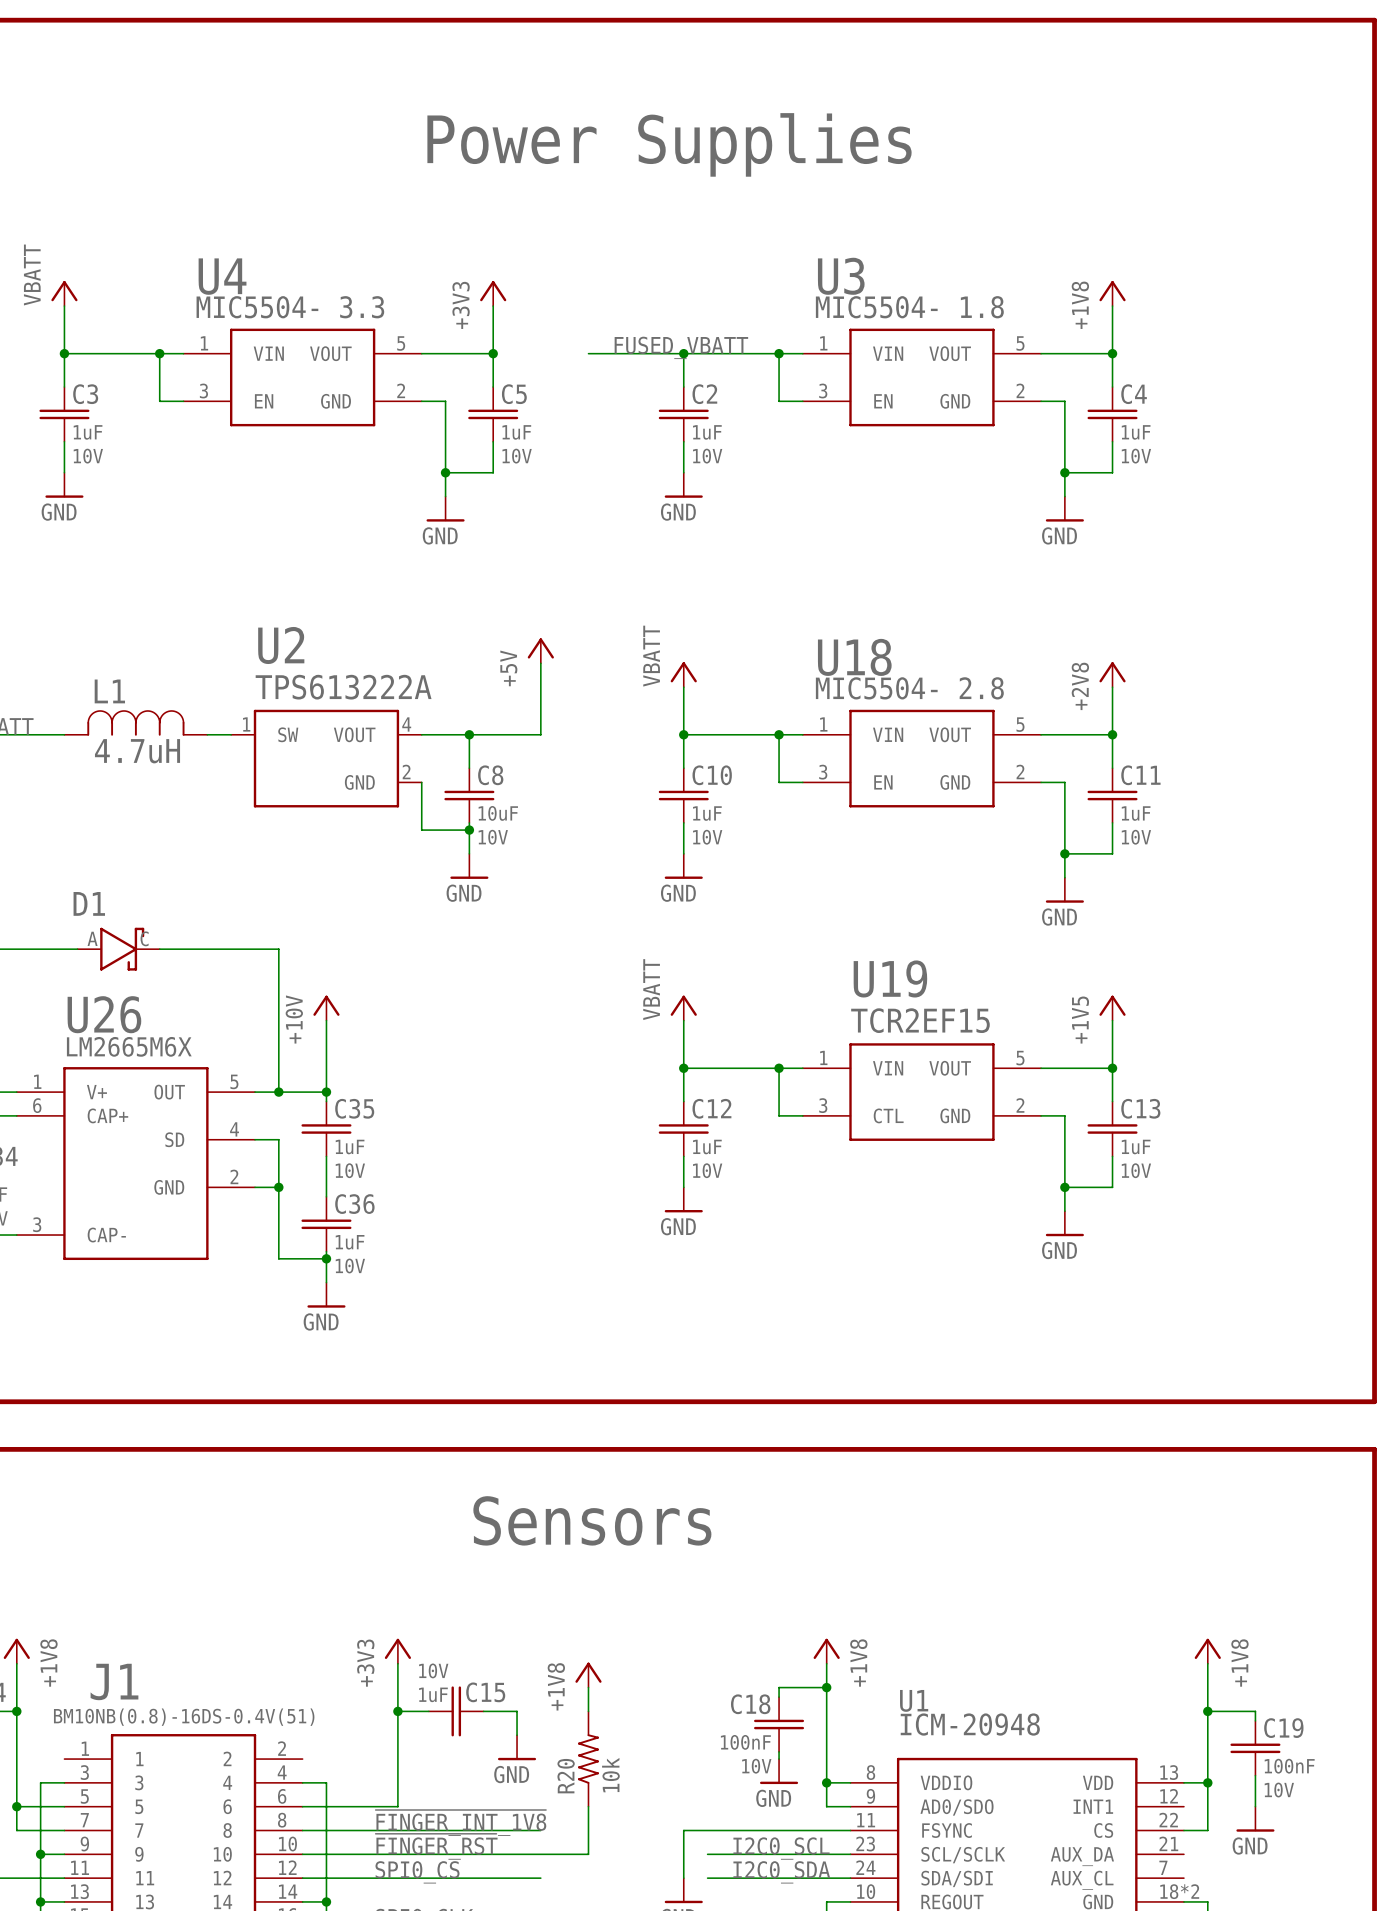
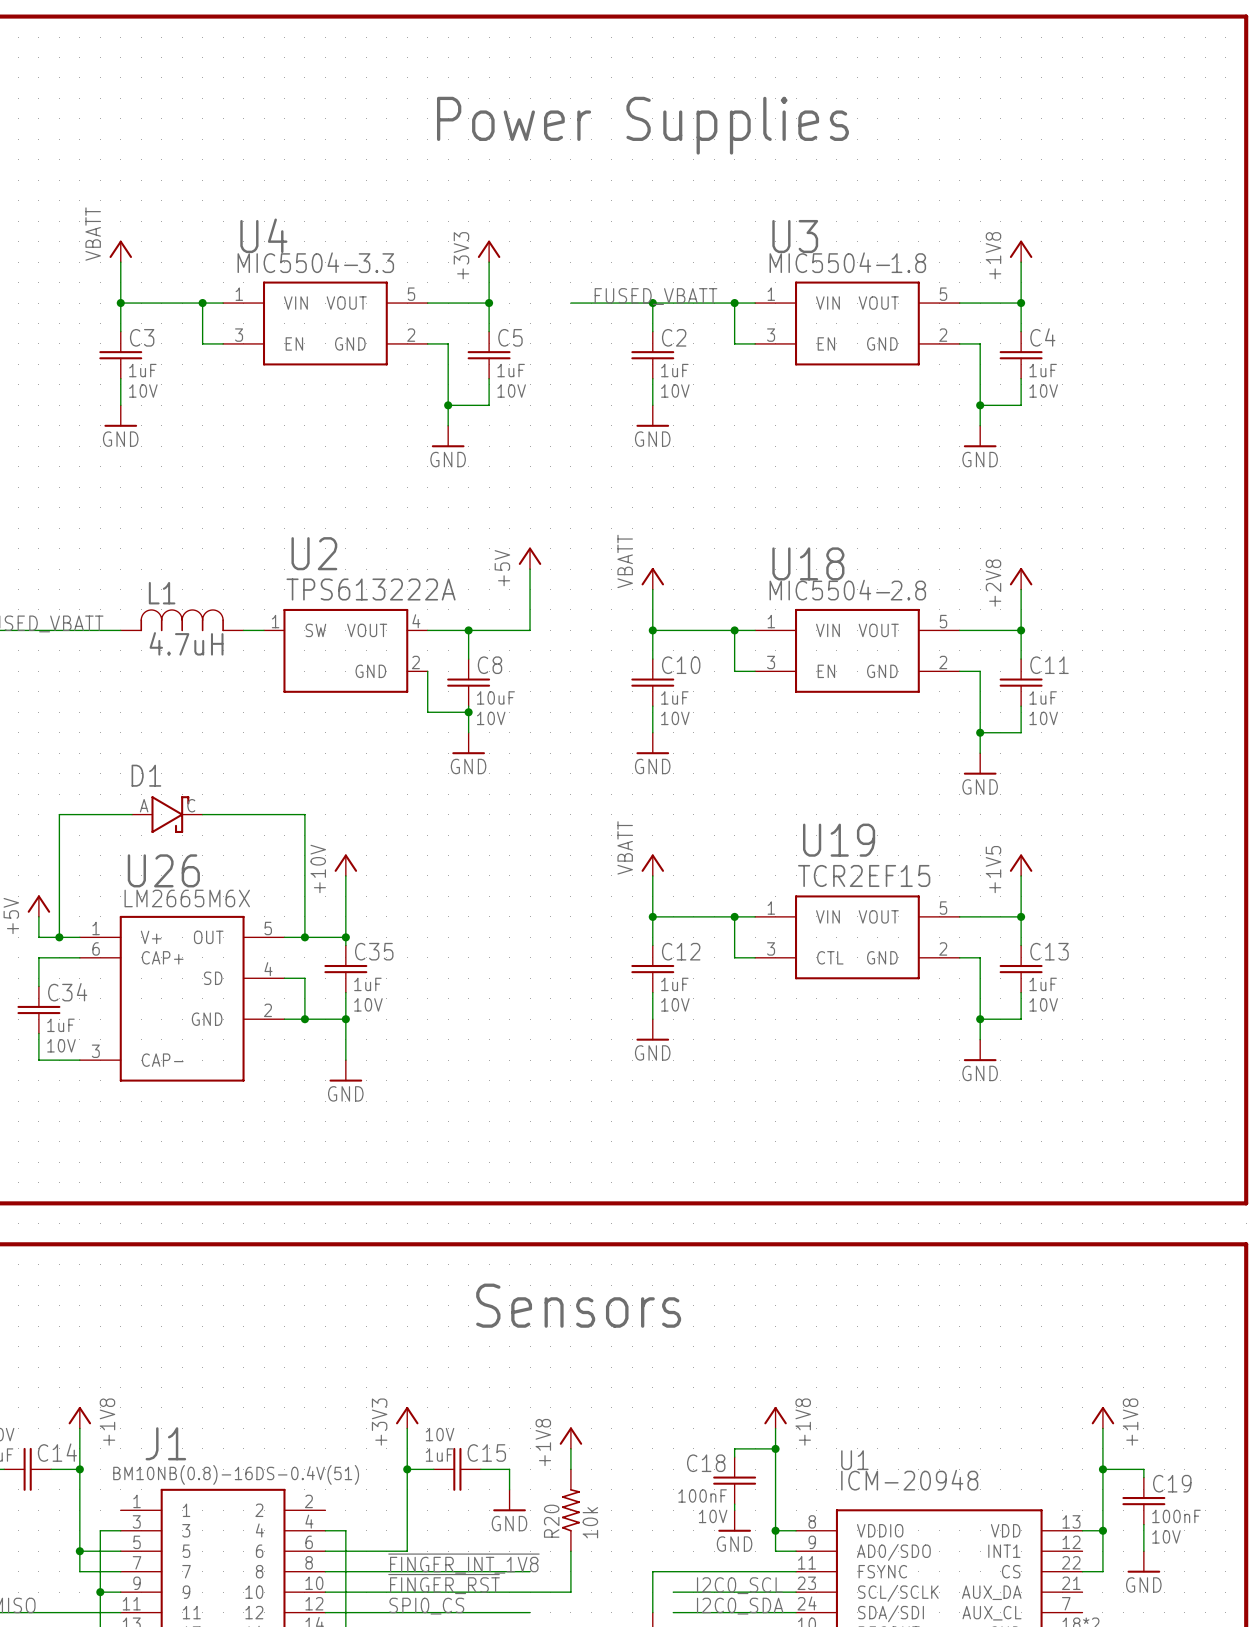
wire: (278, 1187) (278, 1258) (326, 1258) -> (304, 1019) (345, 1019)
junction: none -> (345, 1019)
C36: 1uF (326, 1224) -> none
wire: (326, 1251) (326, 1282) -> none
junction: (326, 1258) -> none
power symbol position: GND (326, 1295) -> GND (345, 1070)

